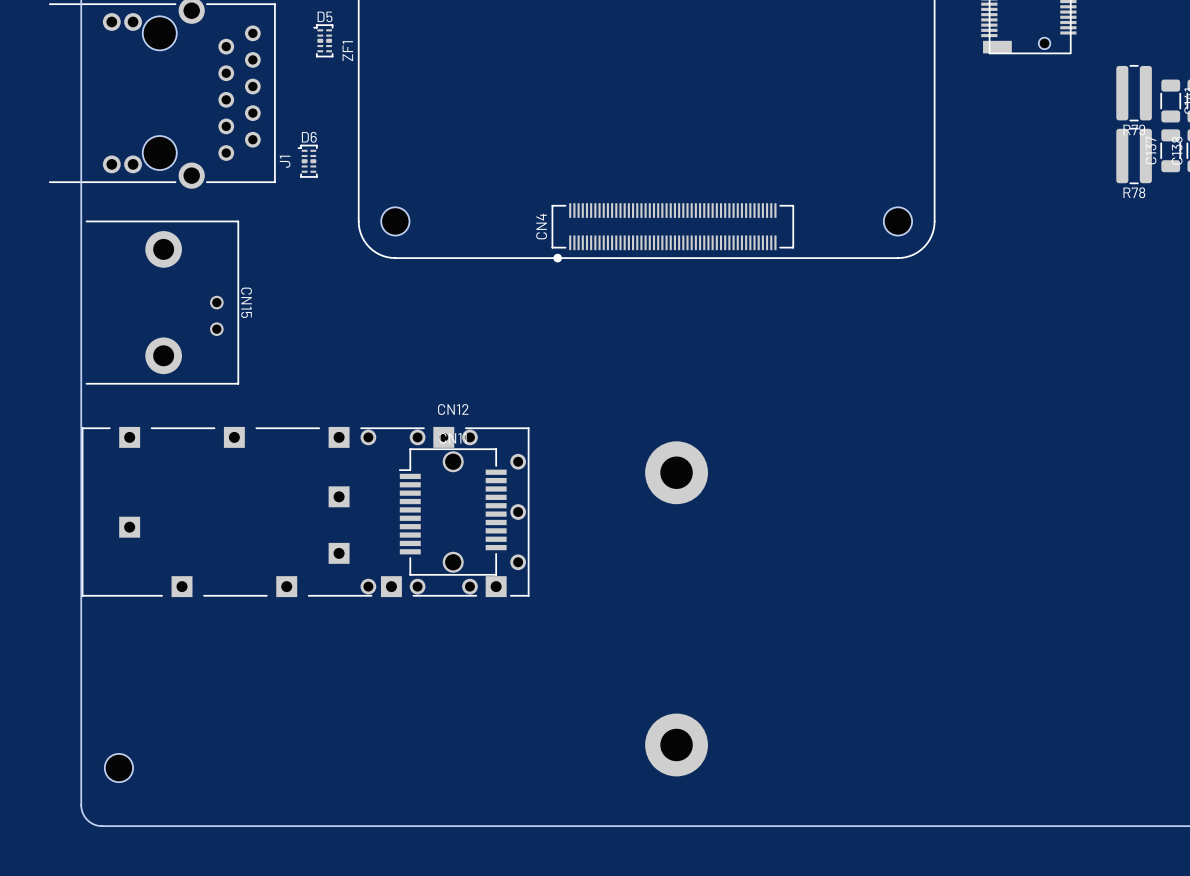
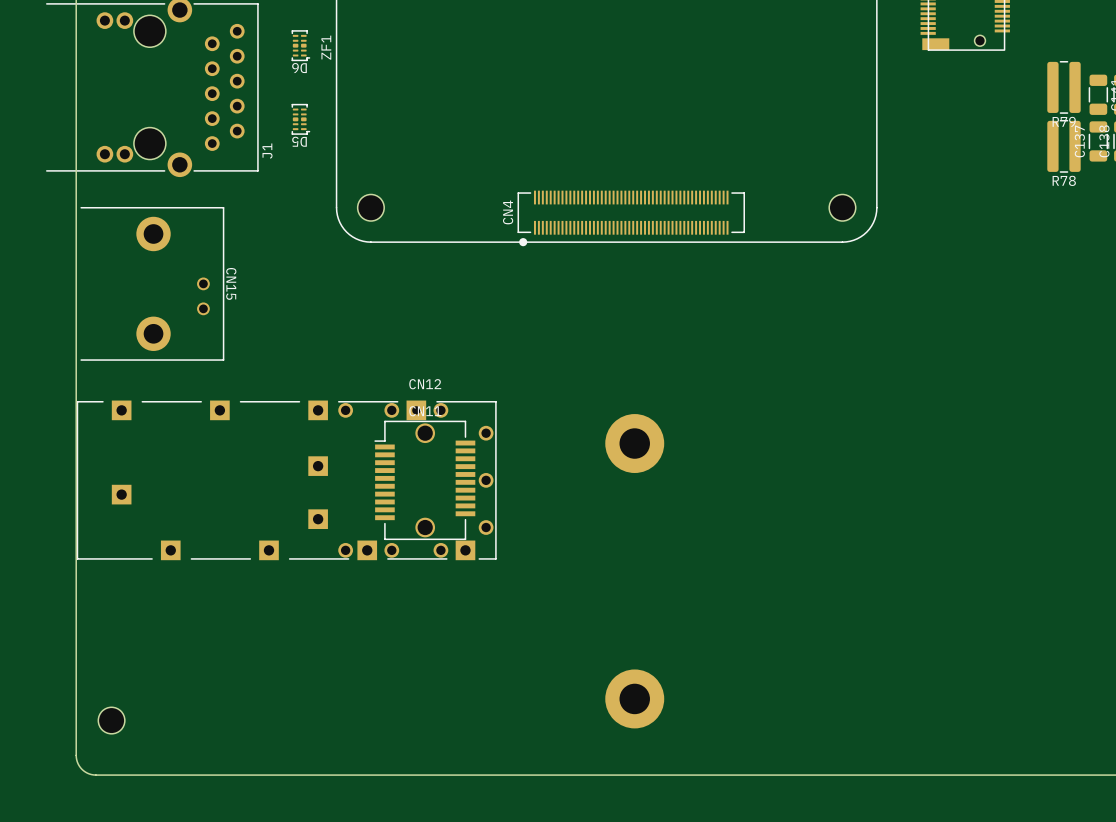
D5 rotation: 0° (323, 40) -> 180° (300, 119)
D5 position: (323, 40) -> (300, 119)
D6 rotation: 0° (307, 161) -> 180° (300, 45)
D6 position: (307, 161) -> (300, 45)

